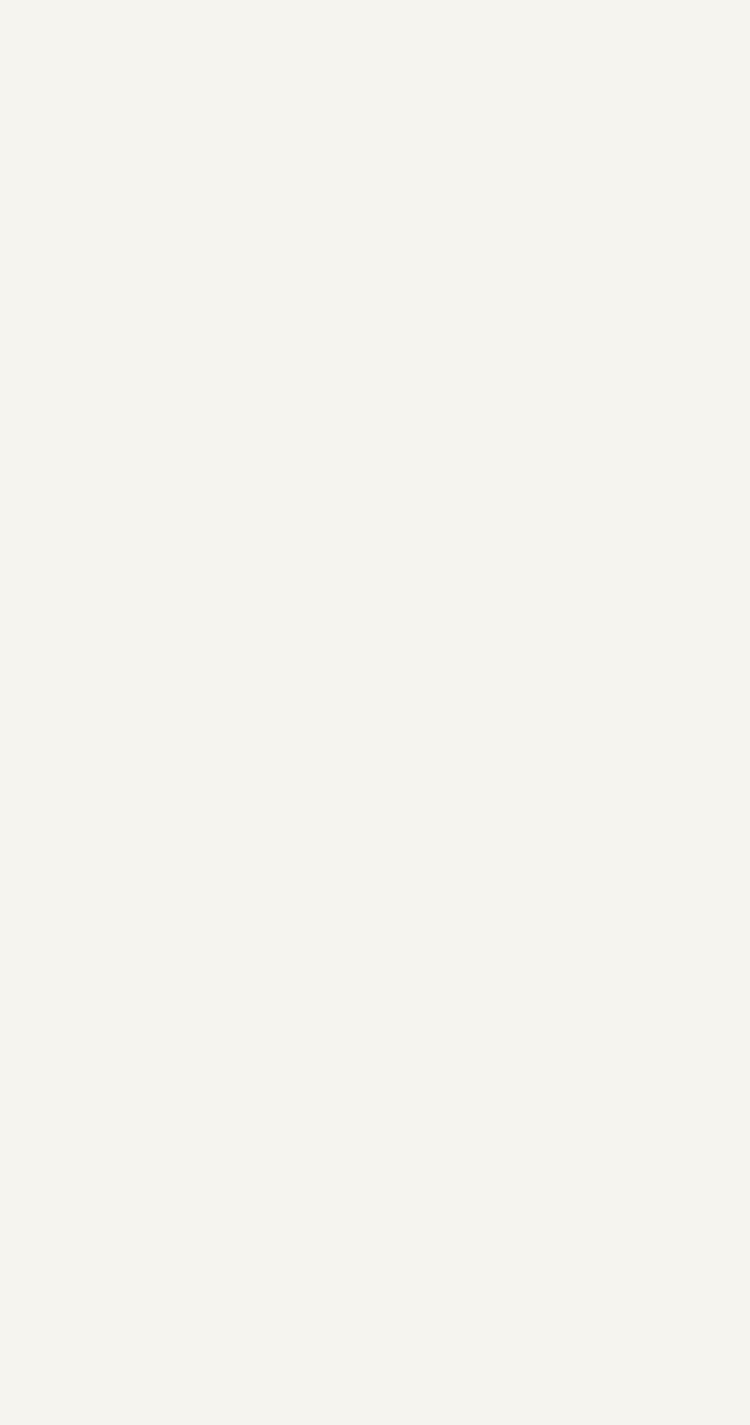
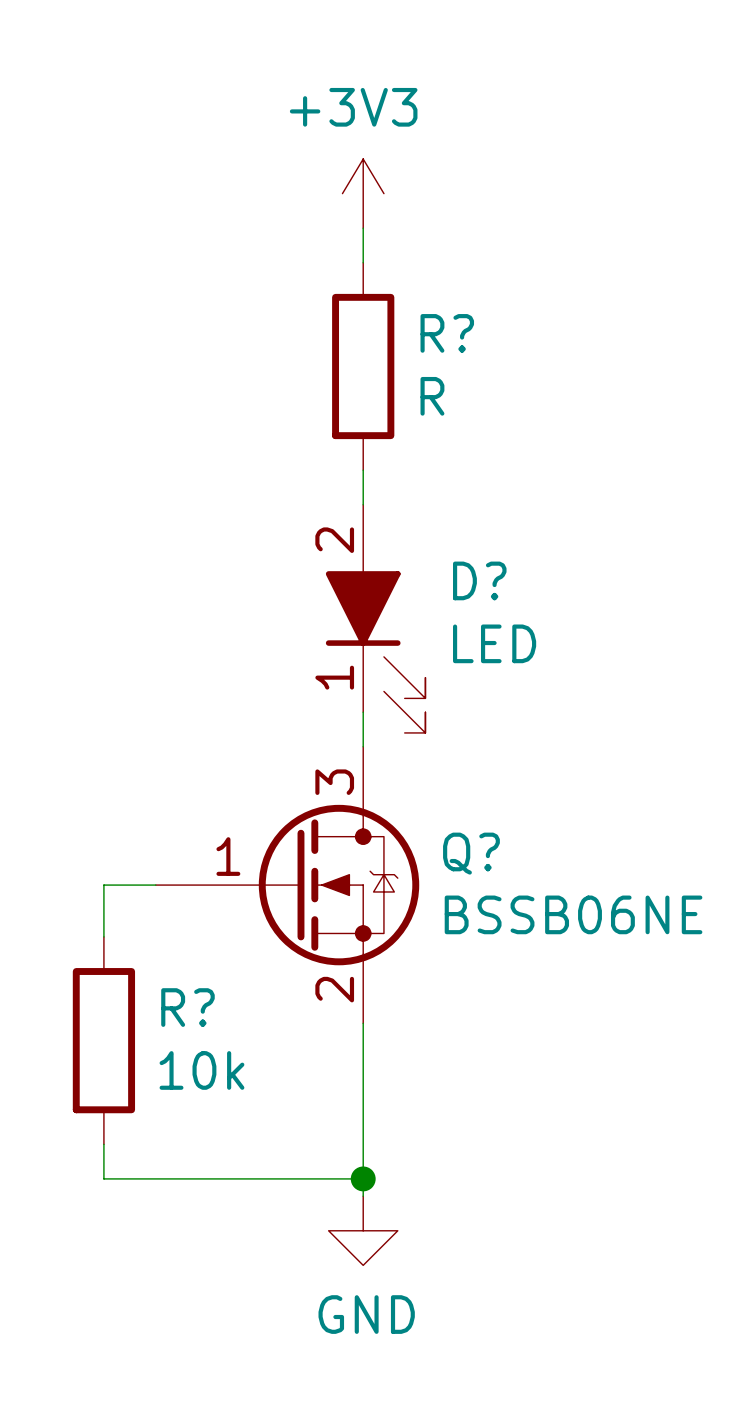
power symbol: none -> +3V3 (363, 193)
wire: none -> (363, 228) (363, 262)
R?: none -> R (363, 366)
wire: none -> (363, 470) (363, 504)
D?: none -> LED (375, 618)
wire: none -> (363, 712) (363, 746)
wire: none -> (155, 885) (103, 885) (103, 936)
Q?: none -> BSSB06NE (287, 885)
wire: none -> (363, 1023) (363, 1196)
R?: none -> 10k (103, 1040)
wire: none -> (103, 1144) (103, 1178) (363, 1178)
junction: none -> (363, 1178)
power symbol: none -> GND (363, 1230)

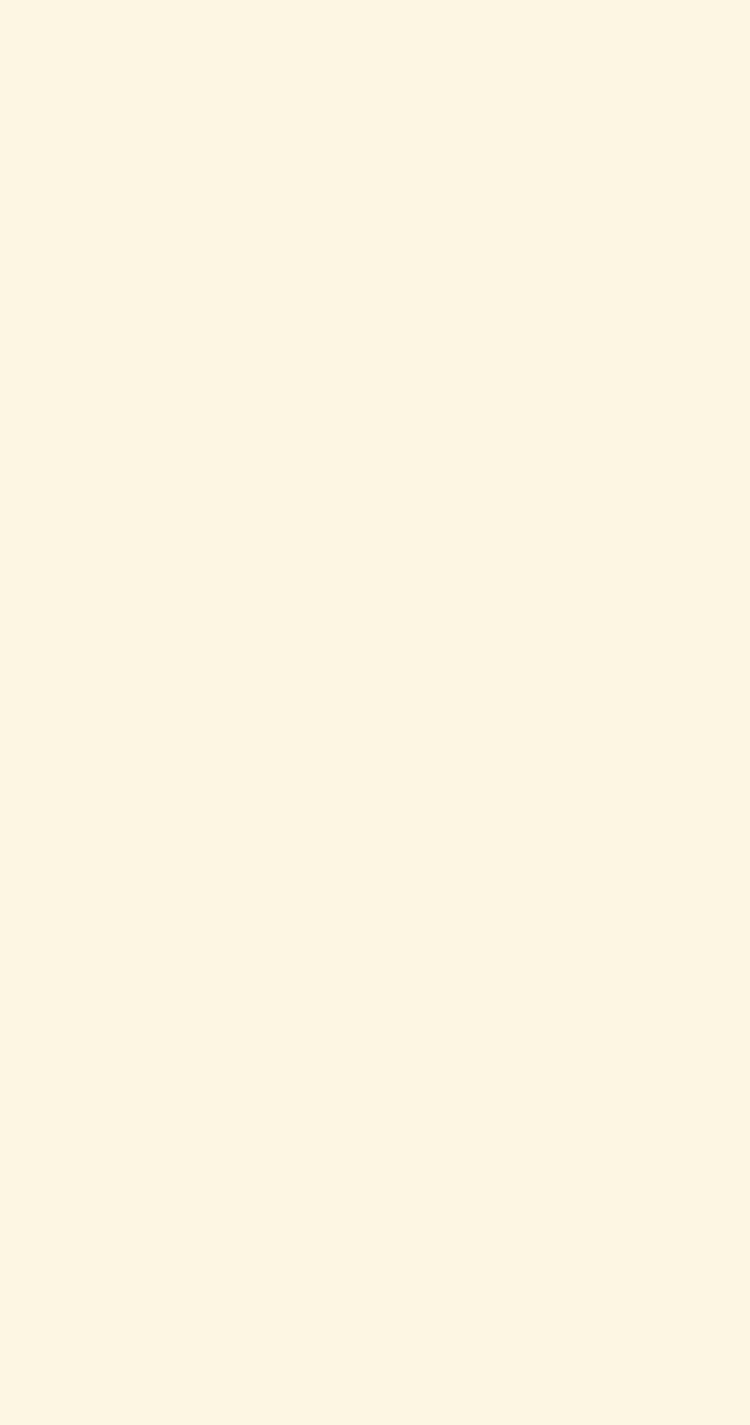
power symbol: +3V3 (363, 193) -> none
wire: (363, 228) (363, 262) -> none
R?: R (363, 366) -> none
wire: (363, 470) (363, 504) -> none
D?: LED (375, 618) -> none
wire: (363, 712) (363, 746) -> none
wire: (155, 885) (103, 885) (103, 936) -> none
Q?: BSSB06NE (287, 885) -> none
wire: (363, 1023) (363, 1196) -> none
R?: 10k (103, 1040) -> none
wire: (103, 1144) (103, 1178) (363, 1178) -> none
junction: (363, 1178) -> none
power symbol: GND (363, 1230) -> none

